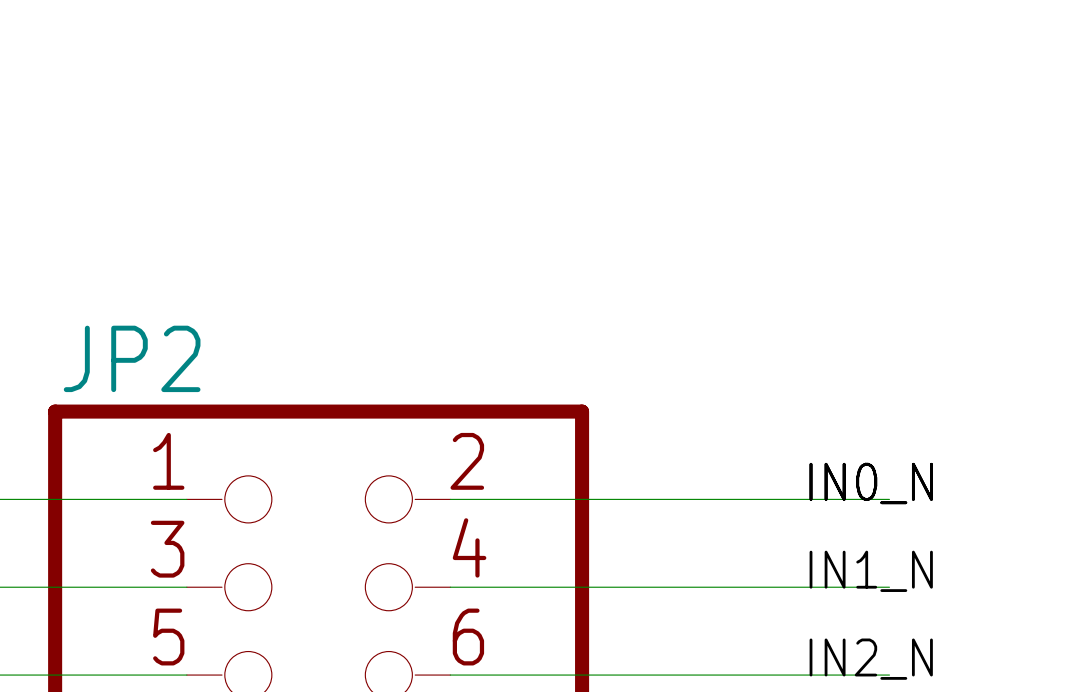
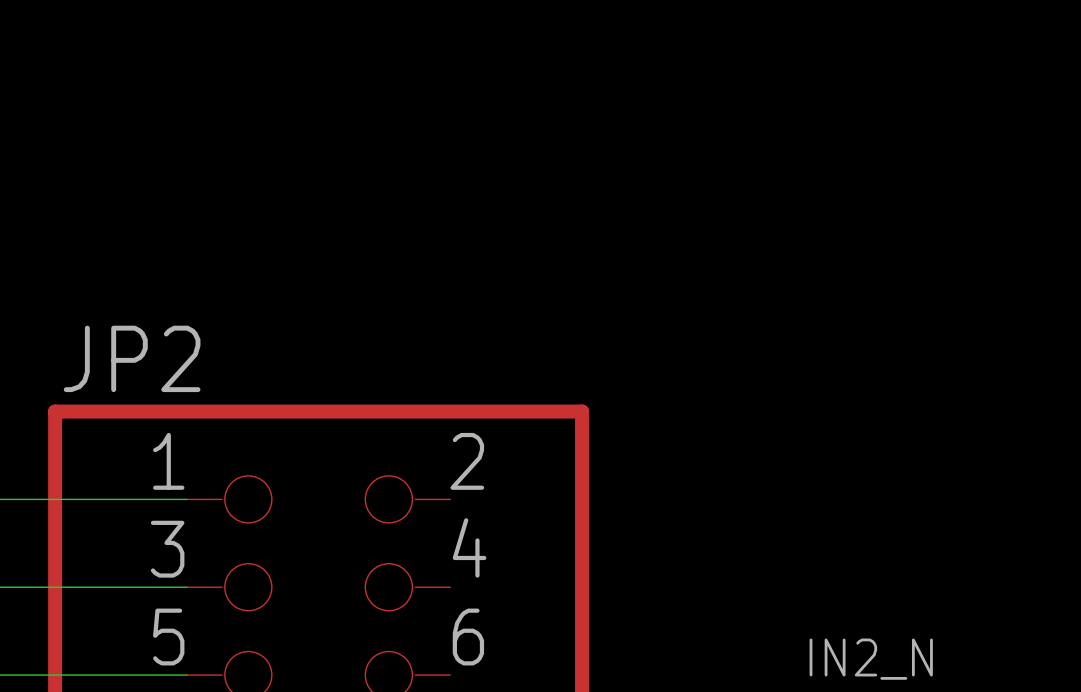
label: IN0_N (871, 483) -> none
wire: (450, 499) (889, 499) -> none
label: IN1_N (871, 571) -> none
wire: (450, 587) (889, 587) -> none
wire: (450, 675) (889, 675) -> none

